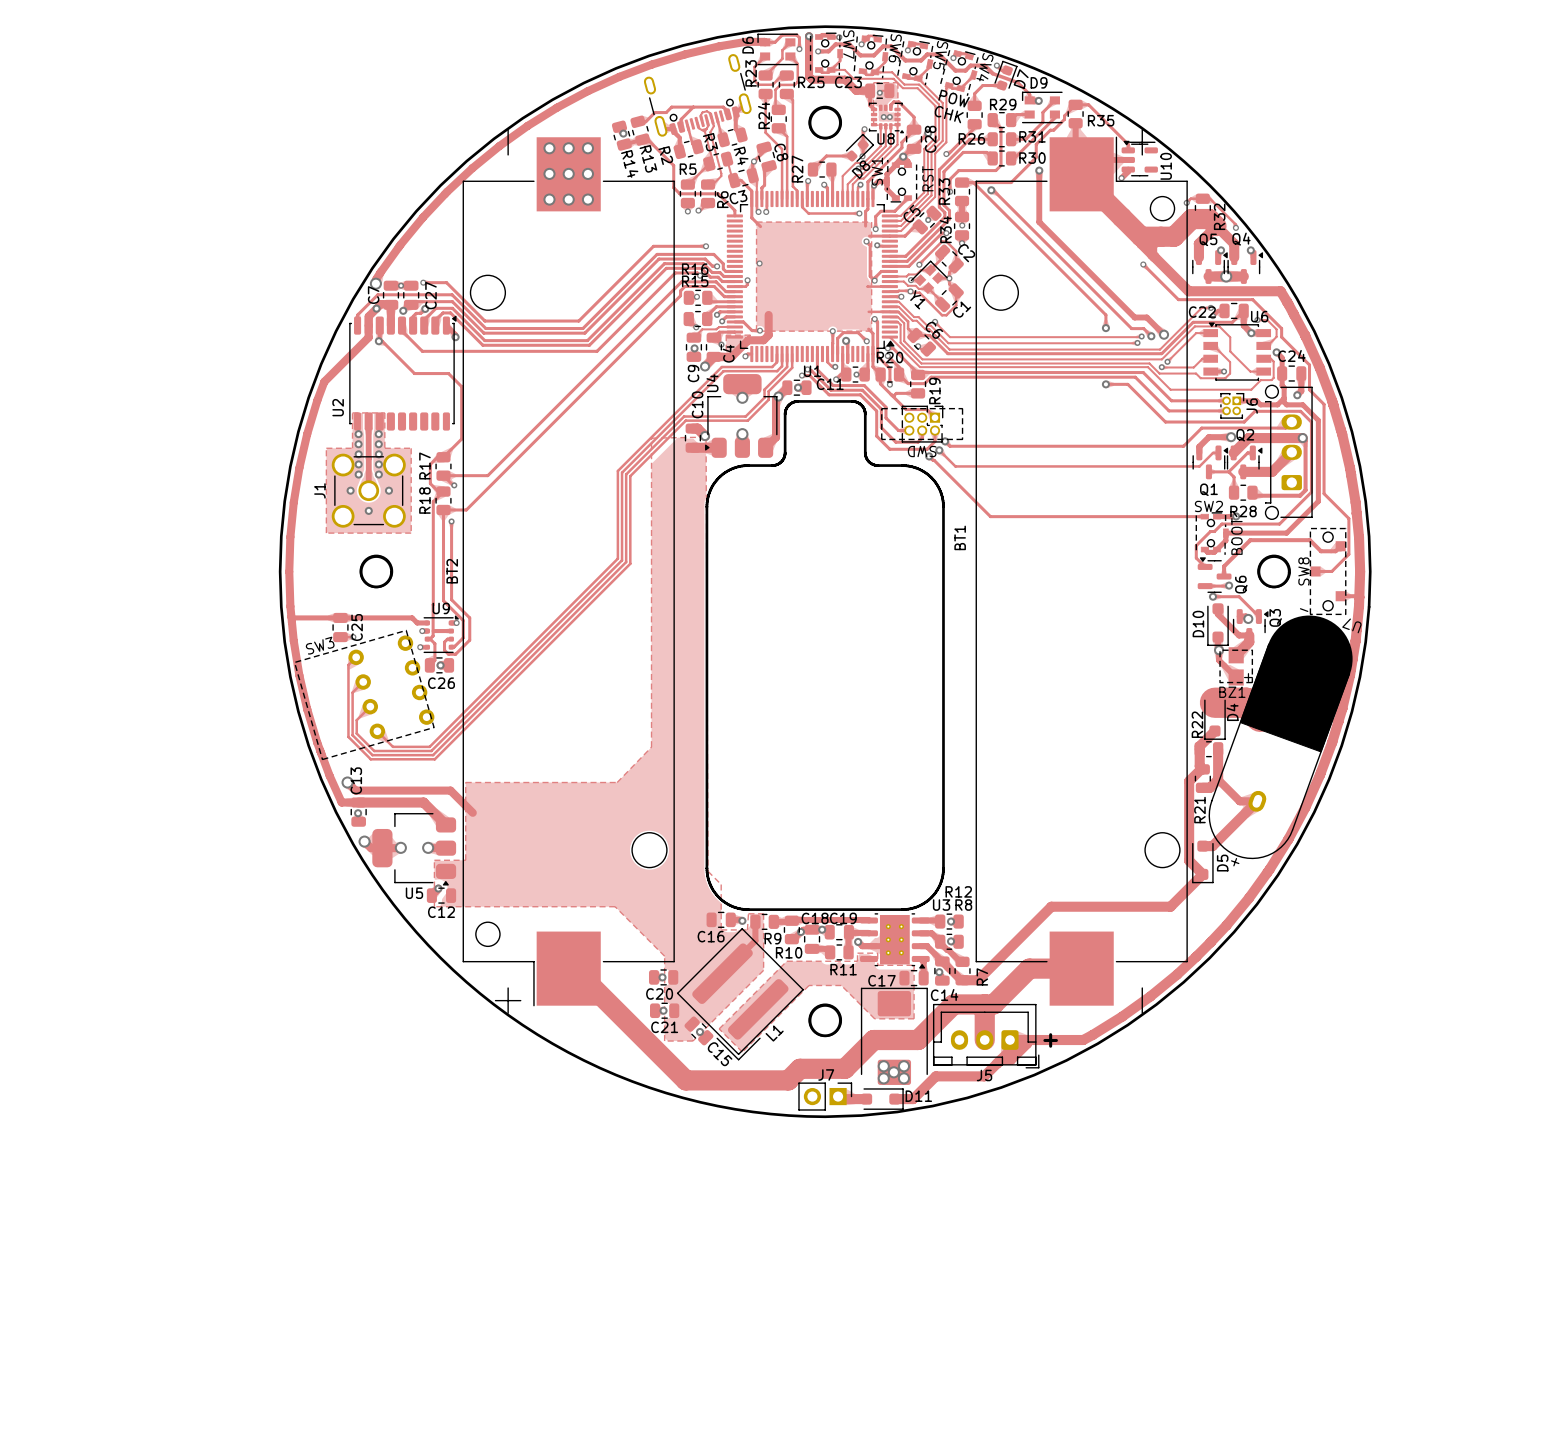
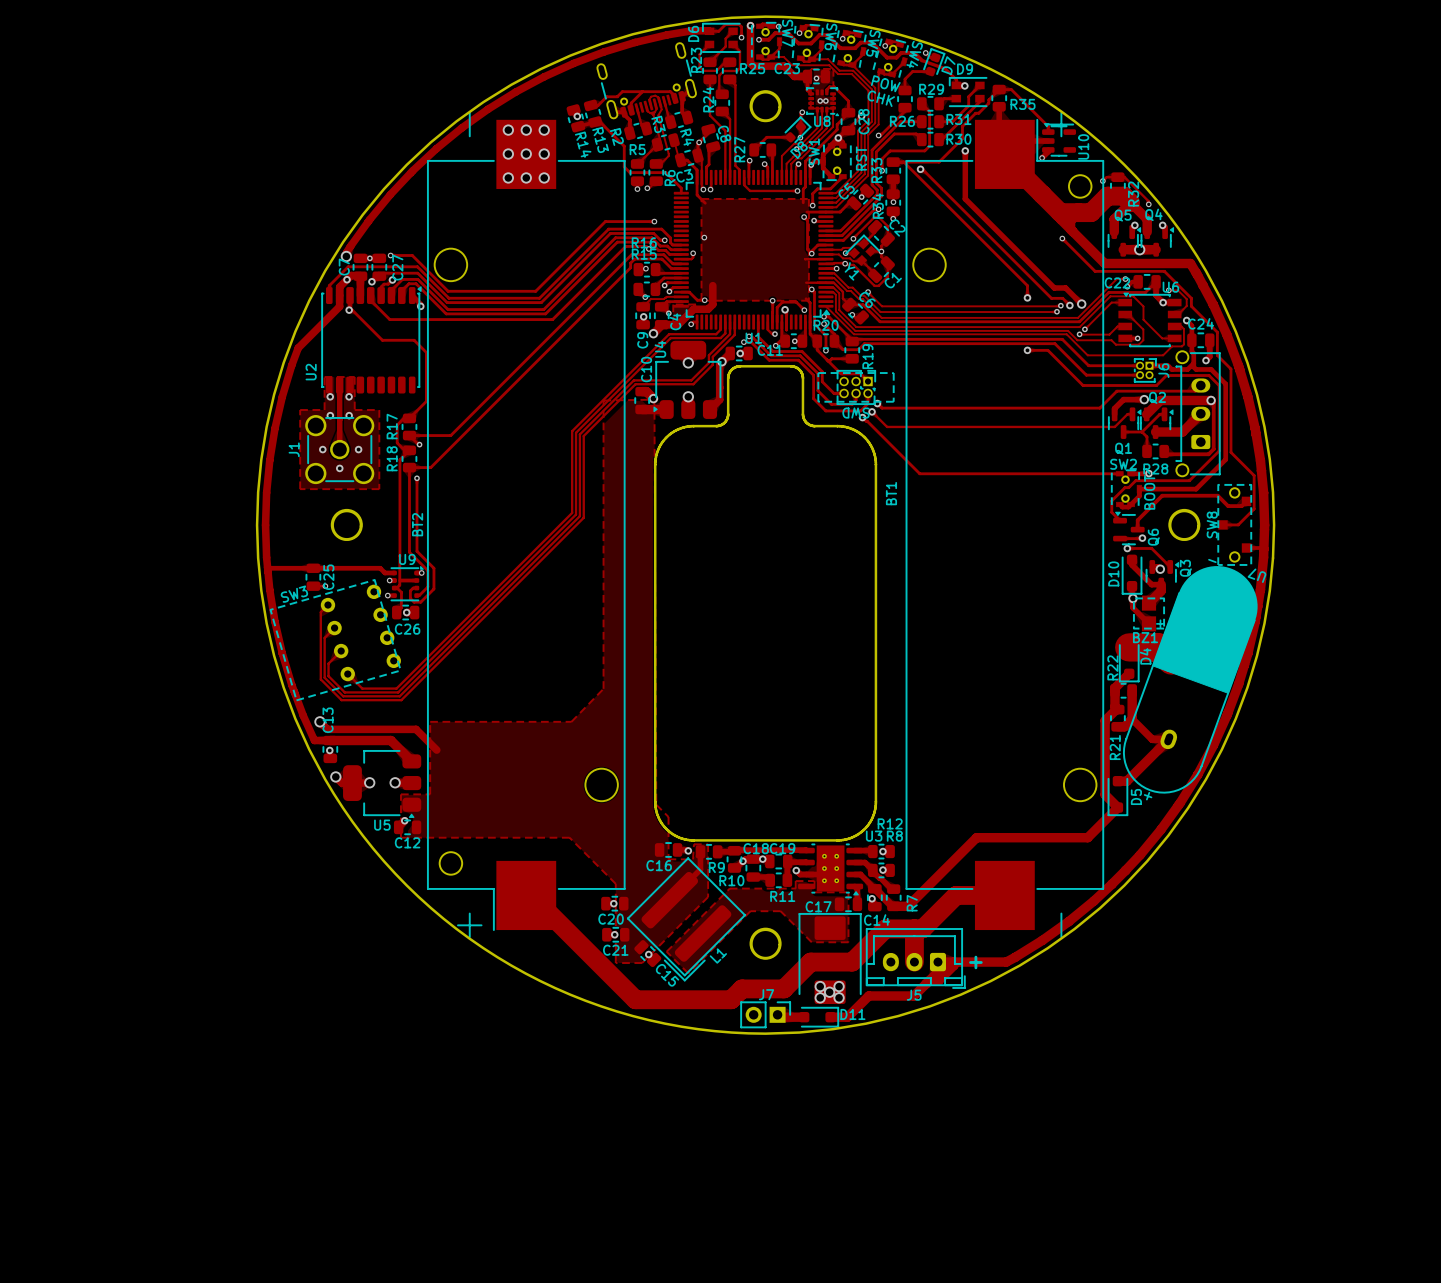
via: (358, 444) -> none
via: (378, 444) -> none
via: (358, 464) -> none
via: (378, 464) -> none
via: (358, 474) -> none
via: (378, 474) -> none

